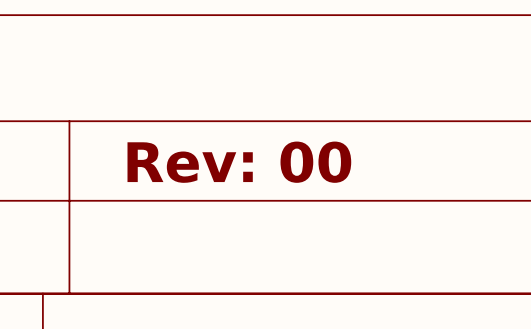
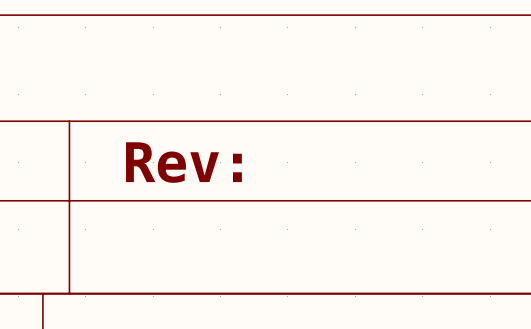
title block: Rev: 00 (239, 162) -> Rev: (183, 162)

